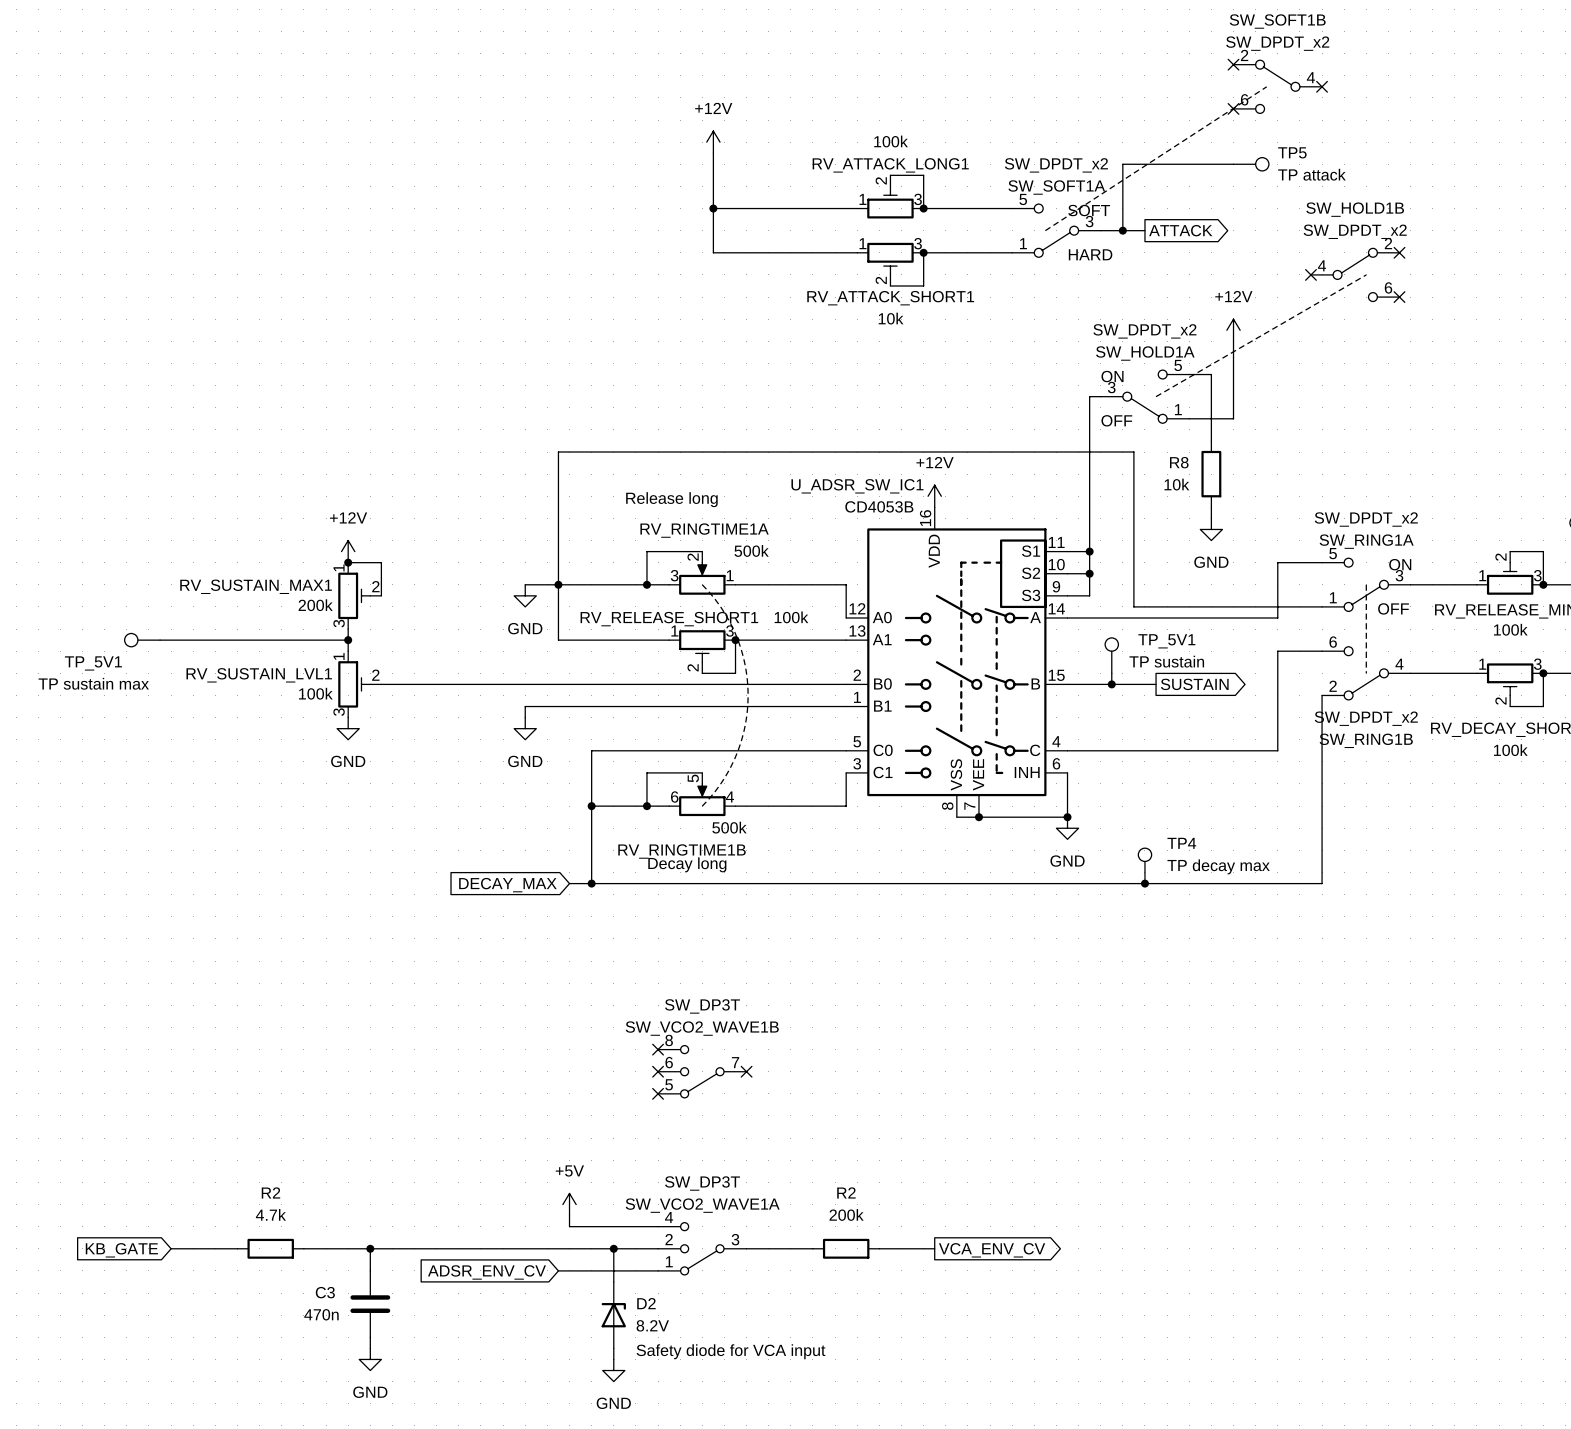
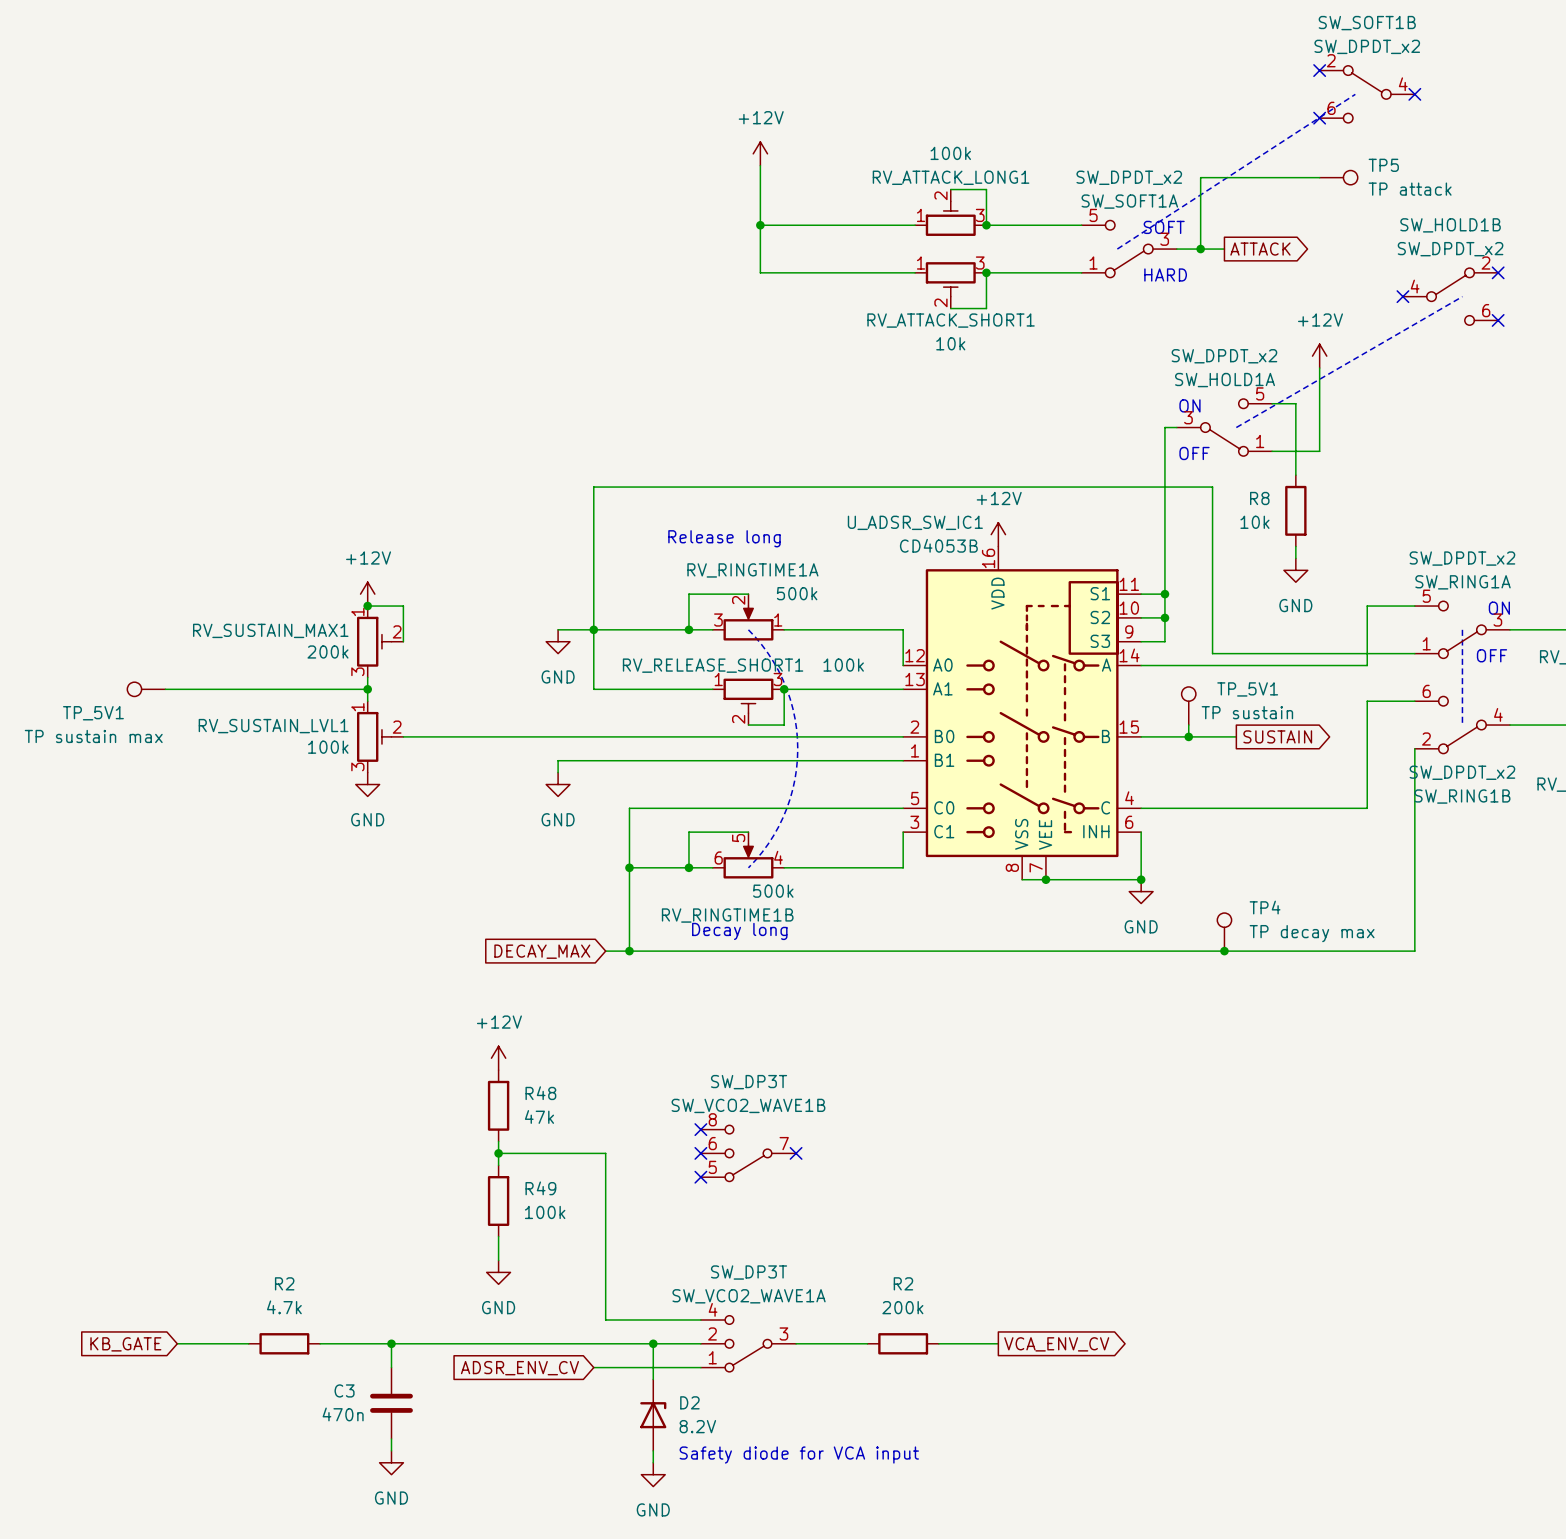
power symbol: none -> +12V (498, 1058)
R48: none -> 47k (498, 1105)
wire: none -> (498, 1141) (498, 1165)
wire: none -> (498, 1153) (605, 1153) (605, 1308)
junction: none -> (498, 1153)
R49: none -> 100k (498, 1201)
wire: none -> (498, 1236) (498, 1260)
power symbol: none -> GND (498, 1272)
power symbol: +5V (569, 1204) -> none

